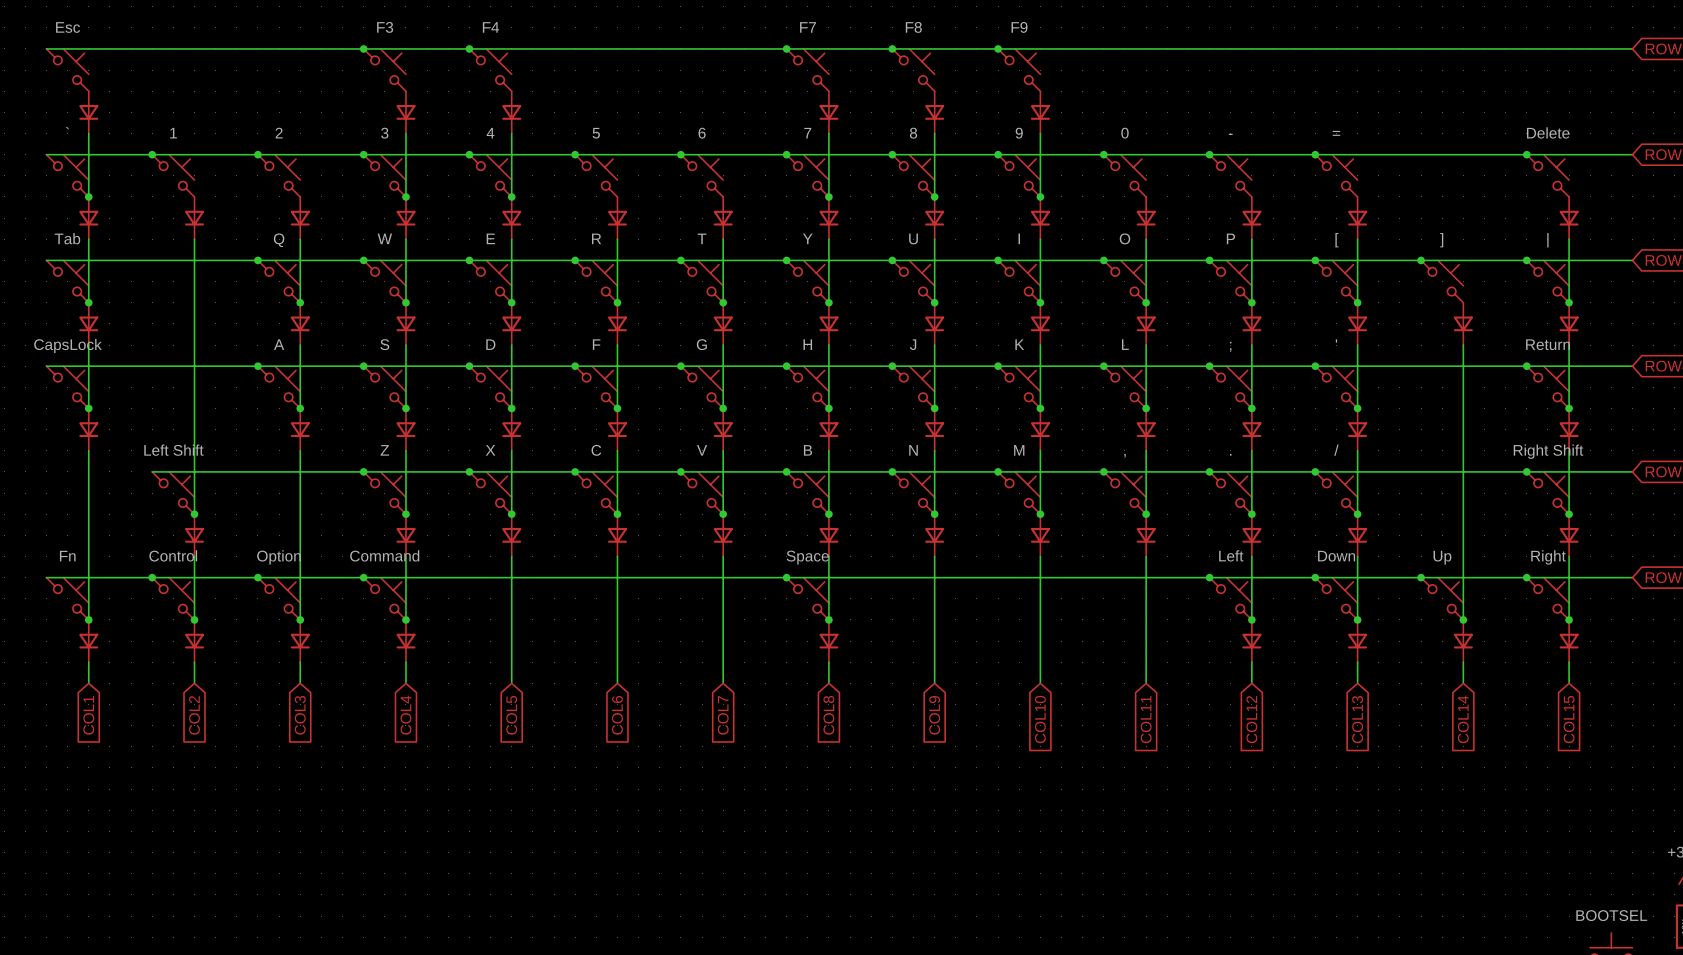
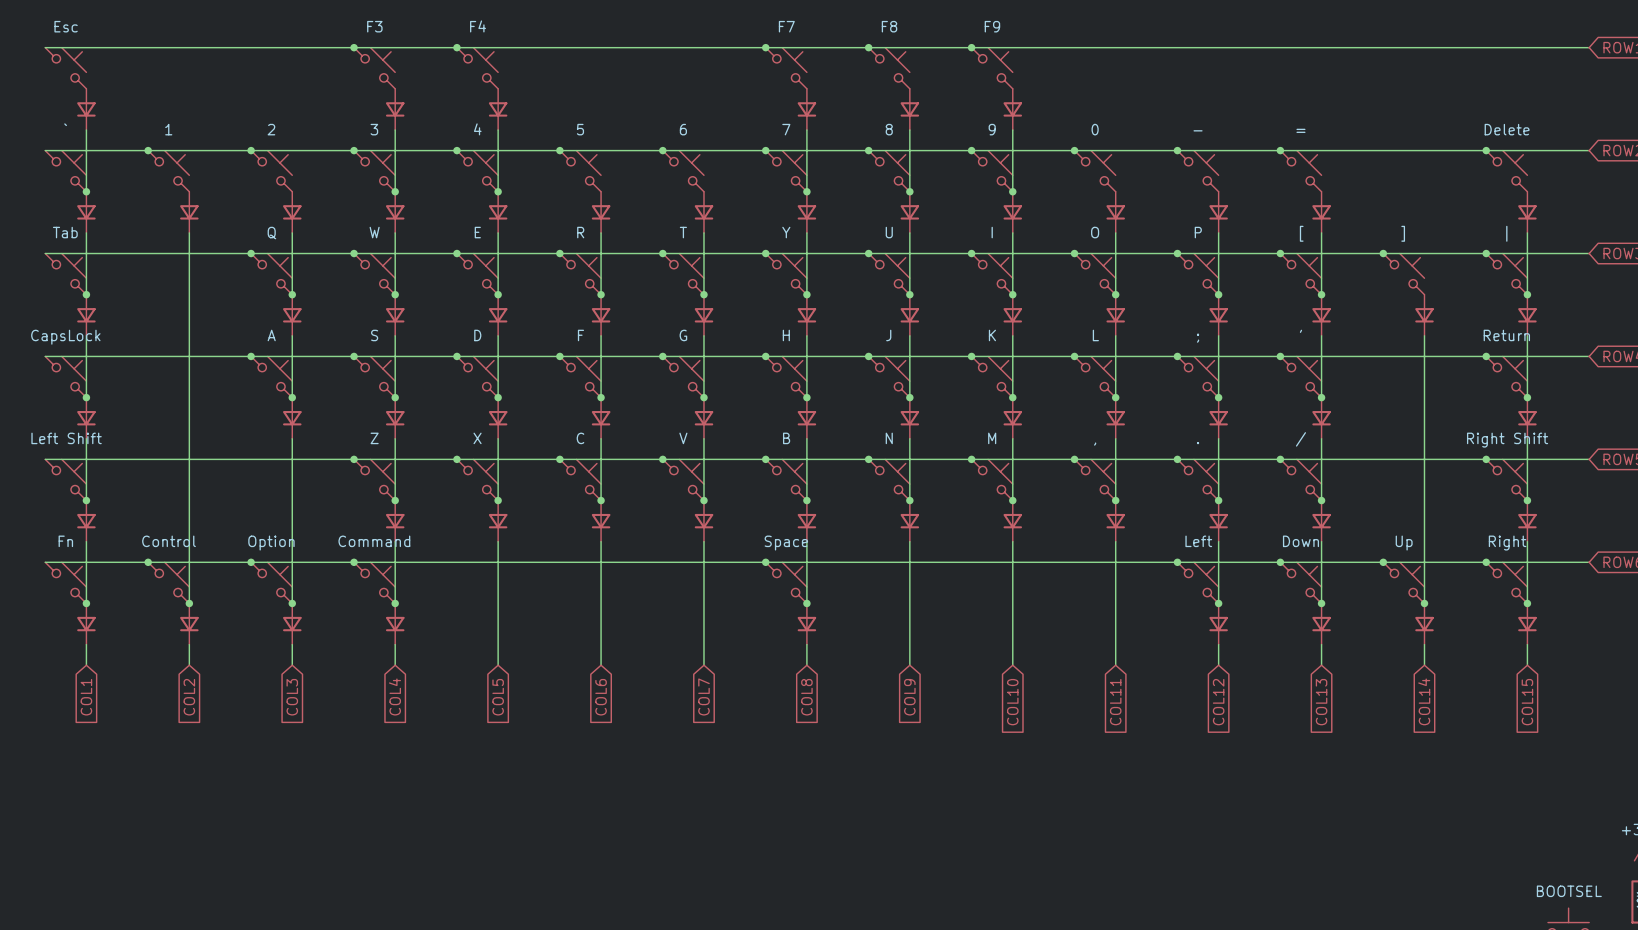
wire: none -> (45, 459) (148, 459)
part position: (173, 493) -> (65, 479)
junction: none -> (86, 500)
junction: (194, 514) -> none
part position: (194, 535) -> (86, 521)

